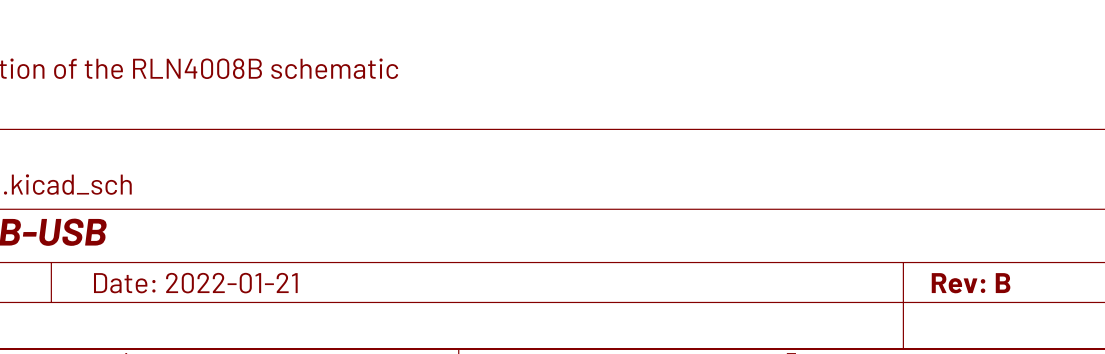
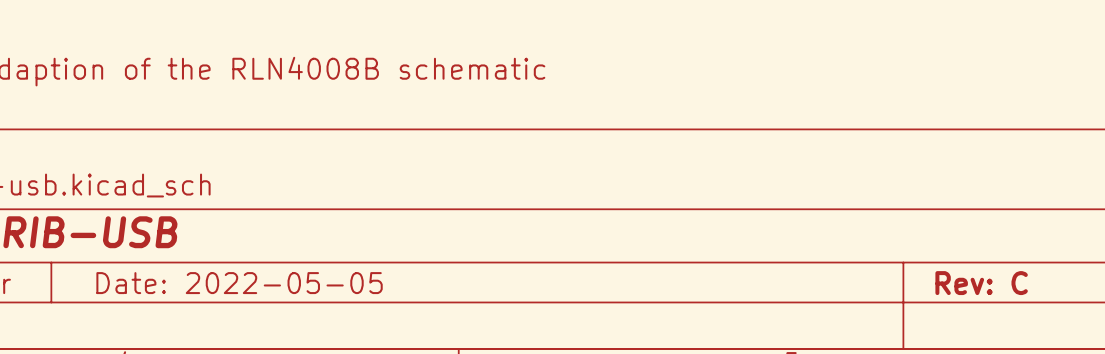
title block: Date: 2022-01-21 (195, 283) -> Date: 2022-05-05 (239, 283)
title block: Rev: B (971, 283) -> Rev: C (981, 283)

